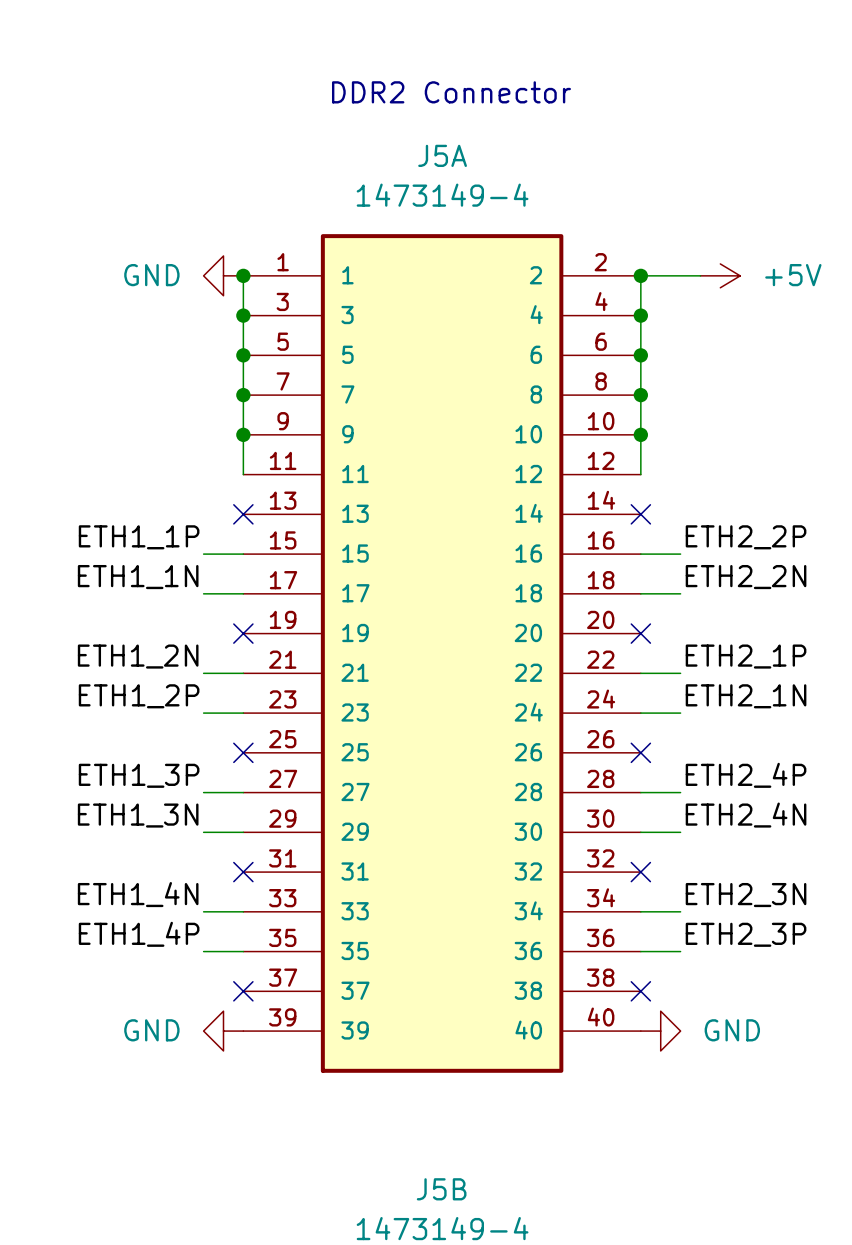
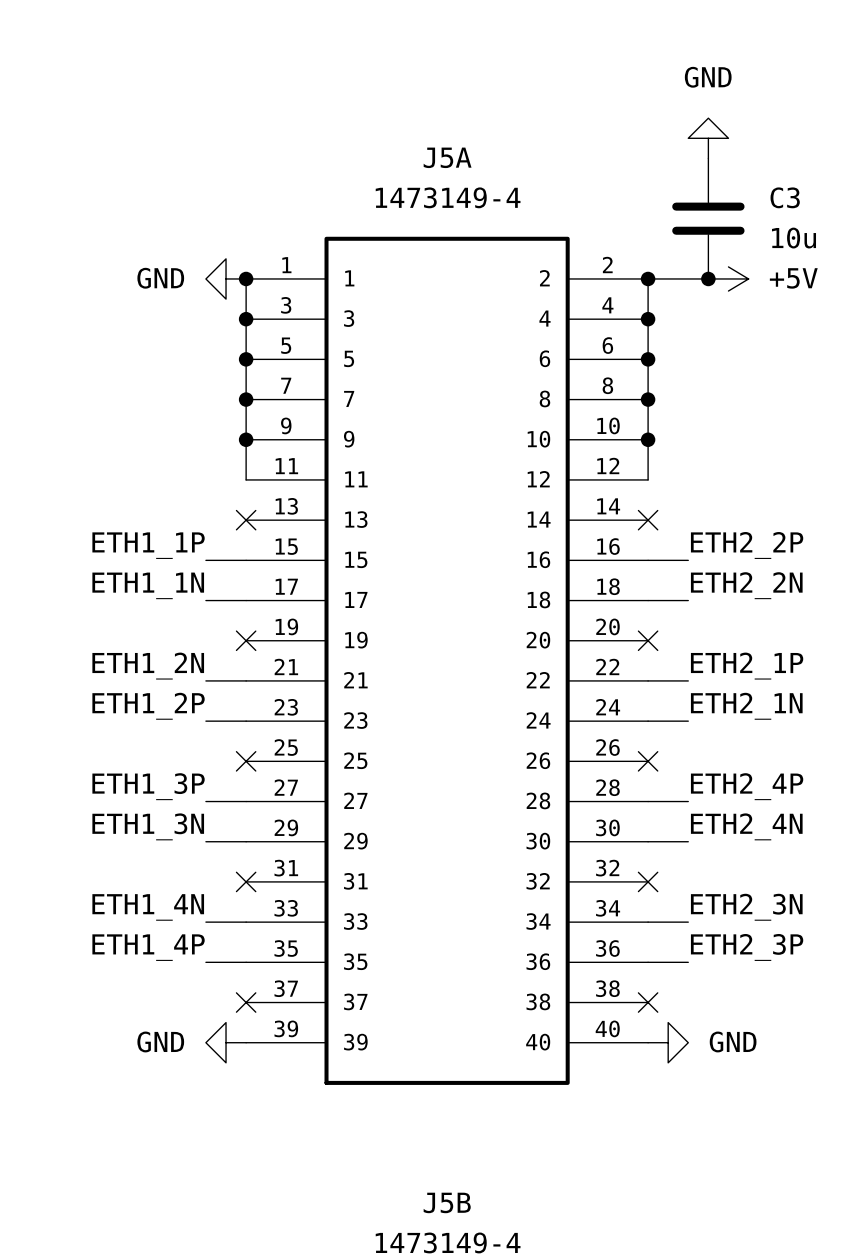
text: DDR2 Connector (451, 92) -> none
power symbol: none -> GND (708, 138)
C3: none -> 10u (708, 218)
junction: none -> (708, 278)

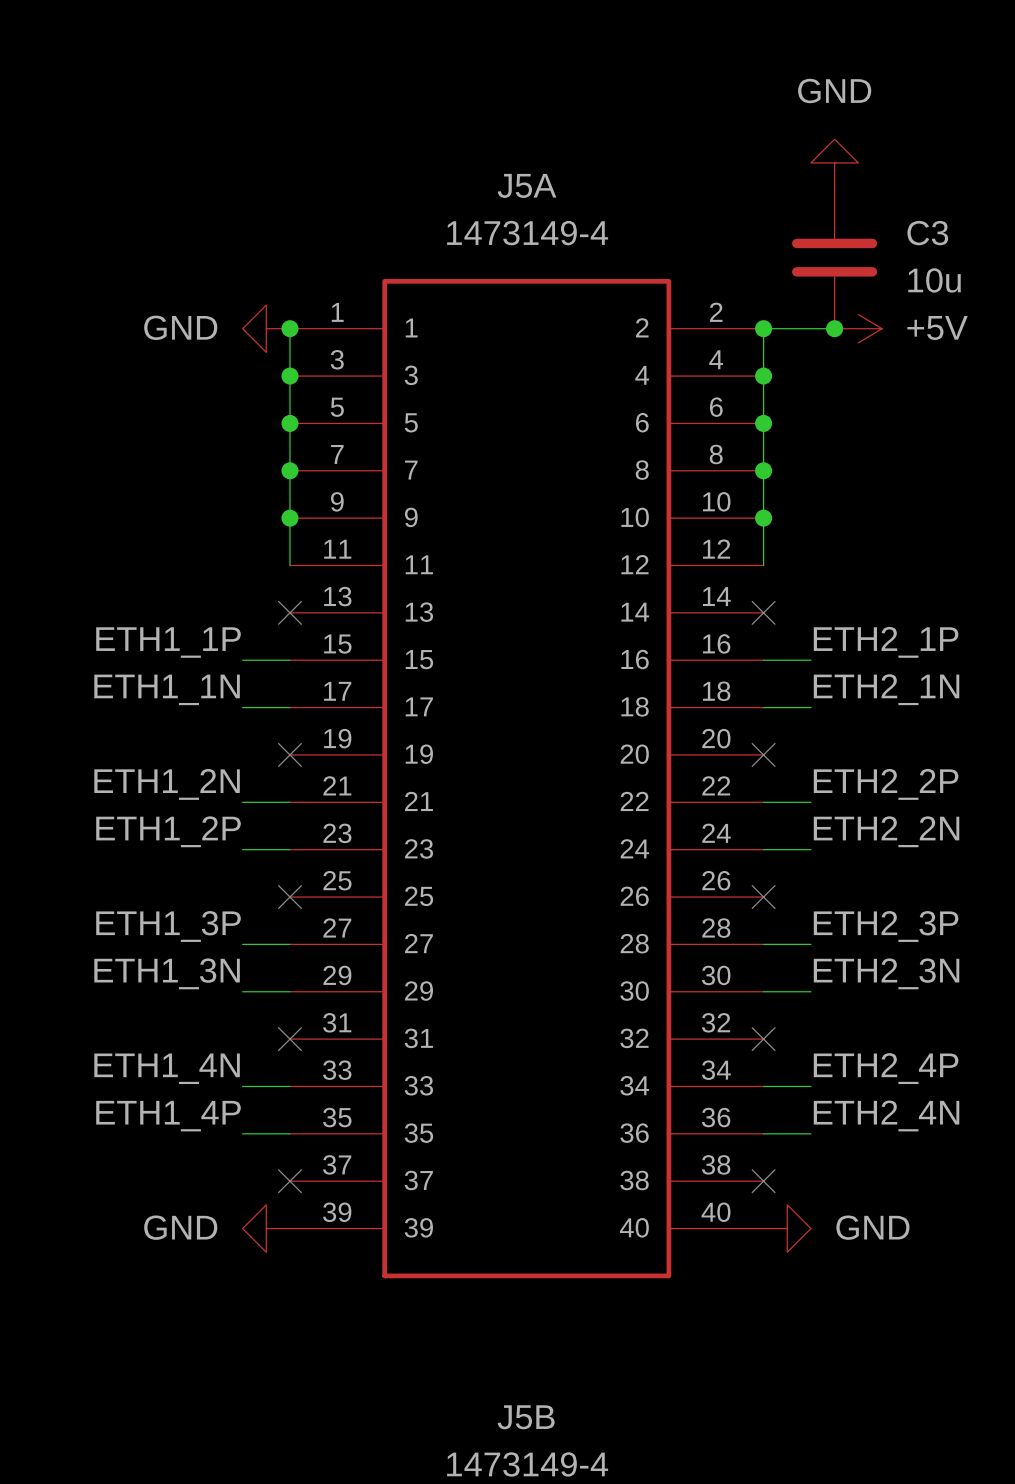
label: ETH2_2P (747, 545) -> ETH2_1P (886, 642)
label: ETH2_2N (746, 585) -> ETH2_1N (886, 689)
label: ETH2_1P (747, 666) -> ETH2_2P (886, 784)
label: ETH2_1N (746, 706) -> ETH2_2N (886, 831)
label: ETH2_4P (747, 786) -> ETH2_3P (886, 926)
label: ETH2_4N (746, 826) -> ETH2_3N (886, 973)
label: ETH2_3N (746, 907) -> ETH2_4P (886, 1068)
label: ETH2_3P (747, 947) -> ETH2_4N (886, 1115)

